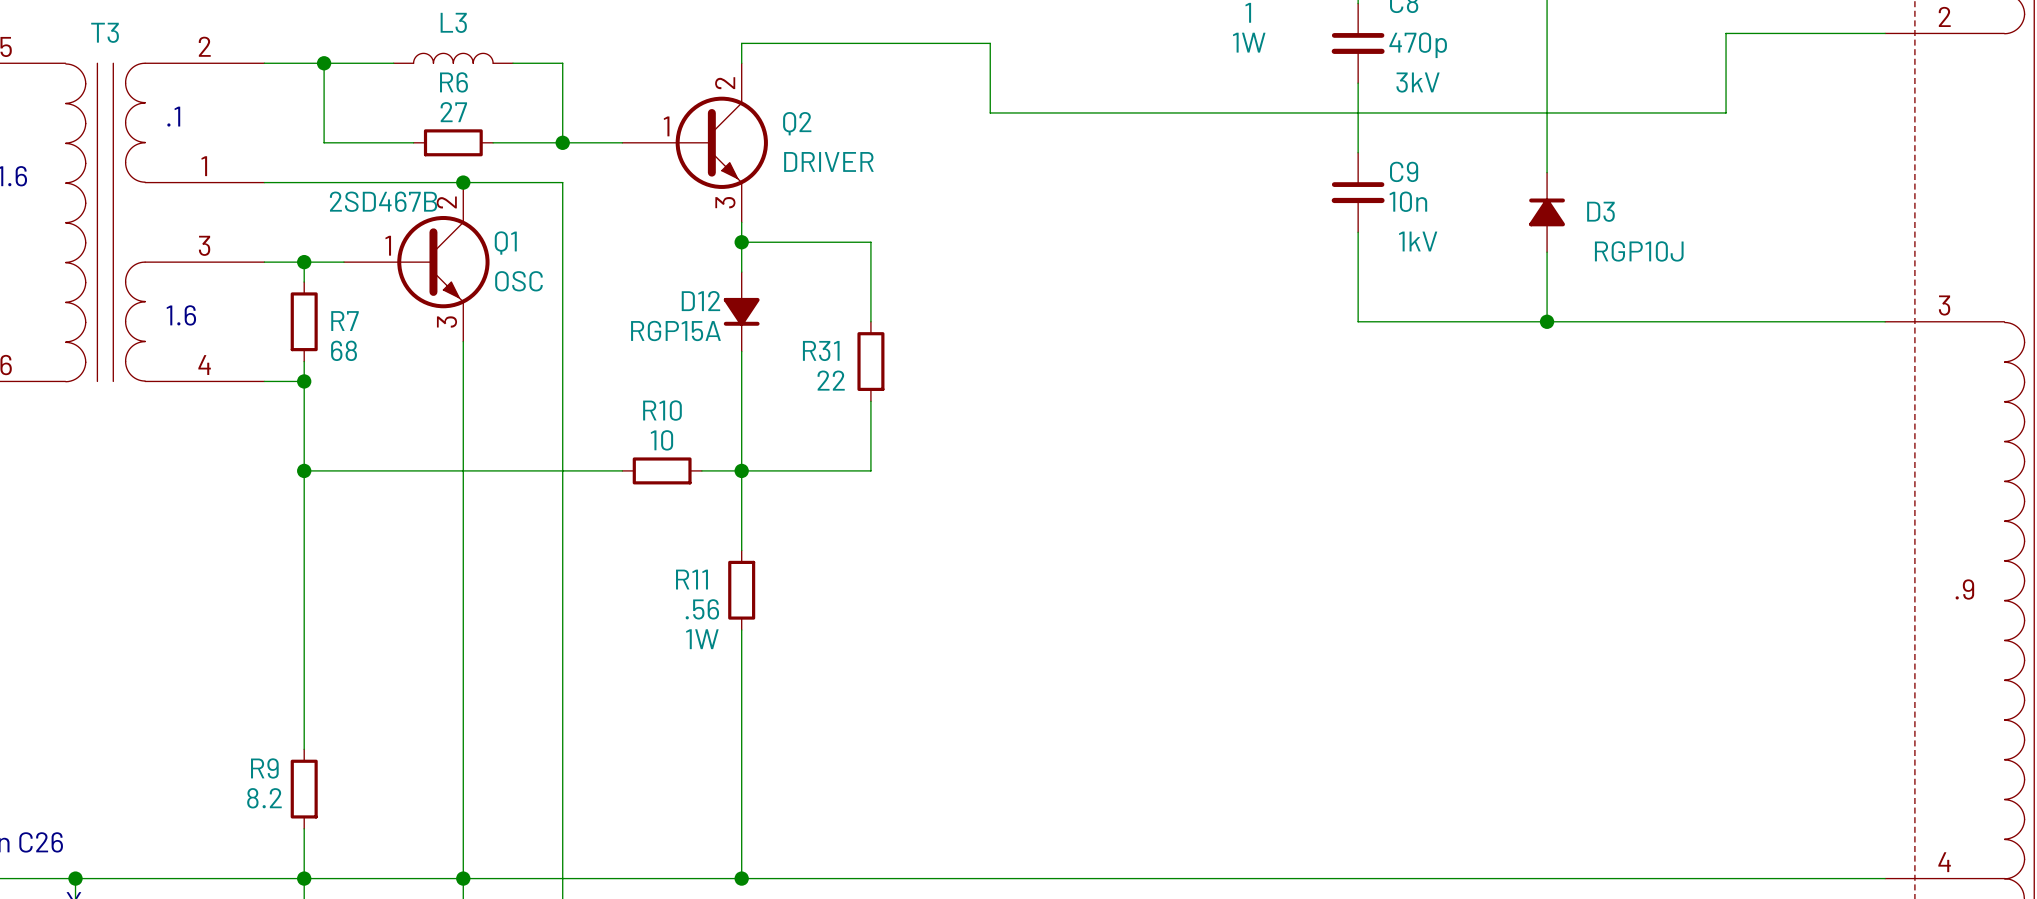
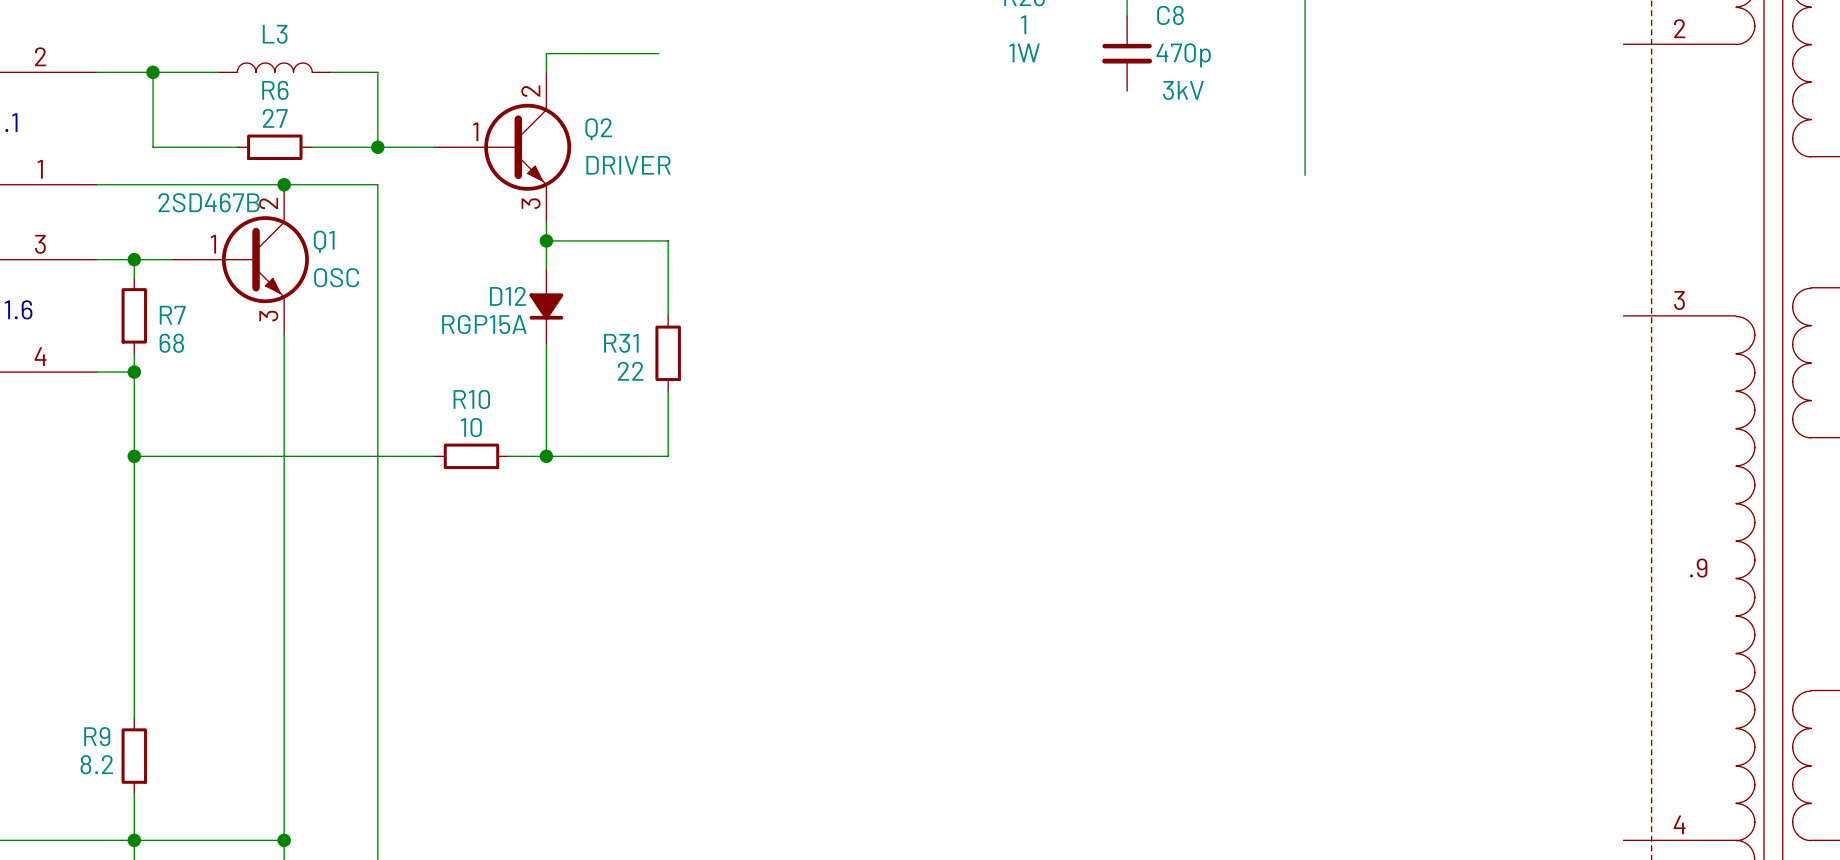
wire: (1885, 33) (1726, 33) (1726, 112) (990, 112) (990, 43) (861, 43) -> none
wire: (1358, 83) (1358, 152) -> none
C9: 10n (1358, 192) -> none
D3: RGP10J (1547, 212) -> none
wire: (1358, 232) (1358, 321) (1885, 321) -> none
wire: (1547, 252) (1547, 321) -> none
junction: (1547, 321) -> none
wire: (741, 470) (741, 550) -> none
R11: .56 (741, 590) -> none
wire: (741, 630) (741, 878) -> none
wire: (463, 878) (1885, 878) -> none
junction: (741, 878) -> none

